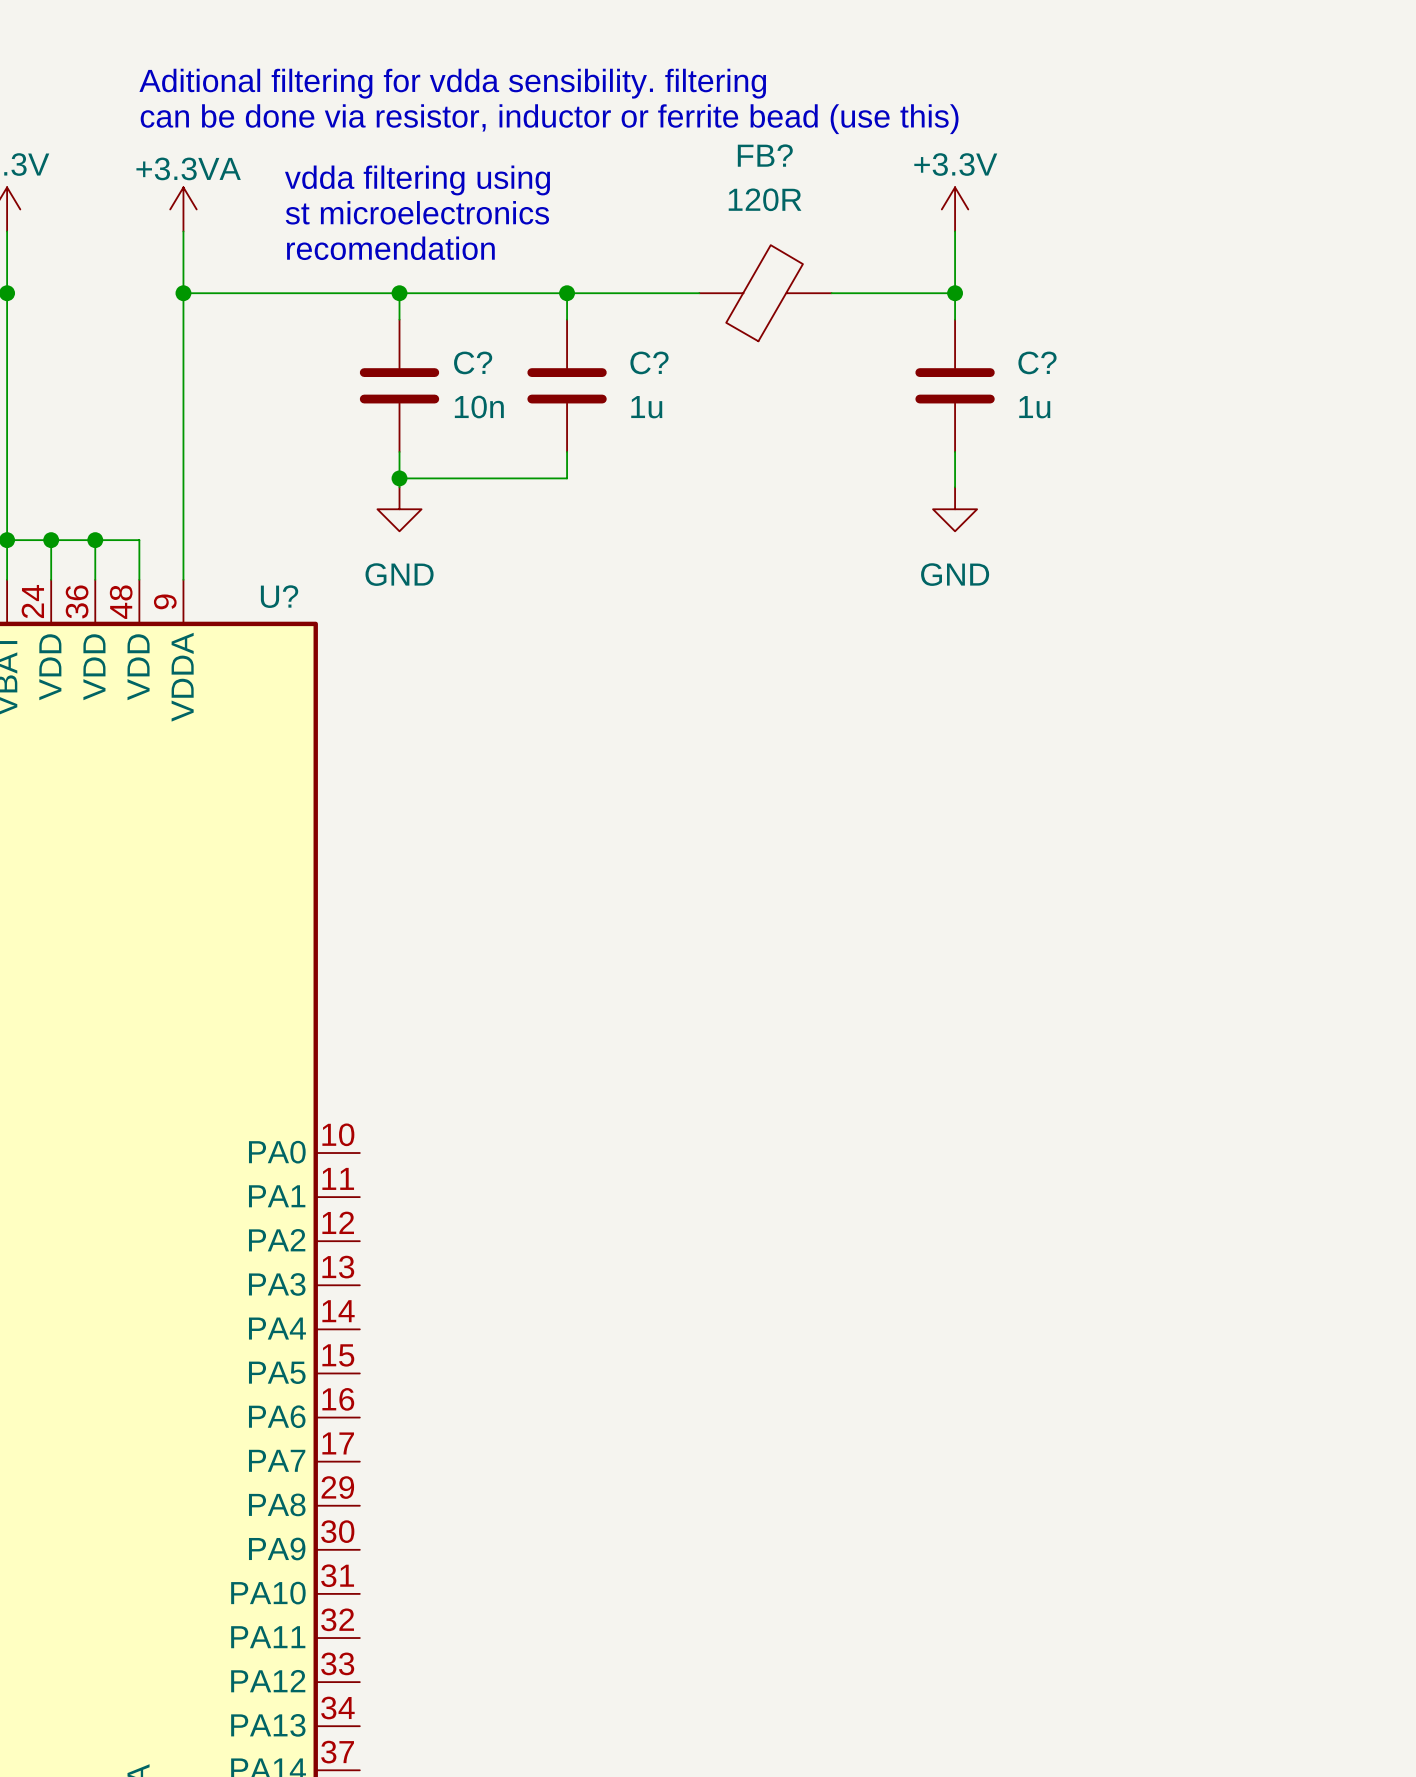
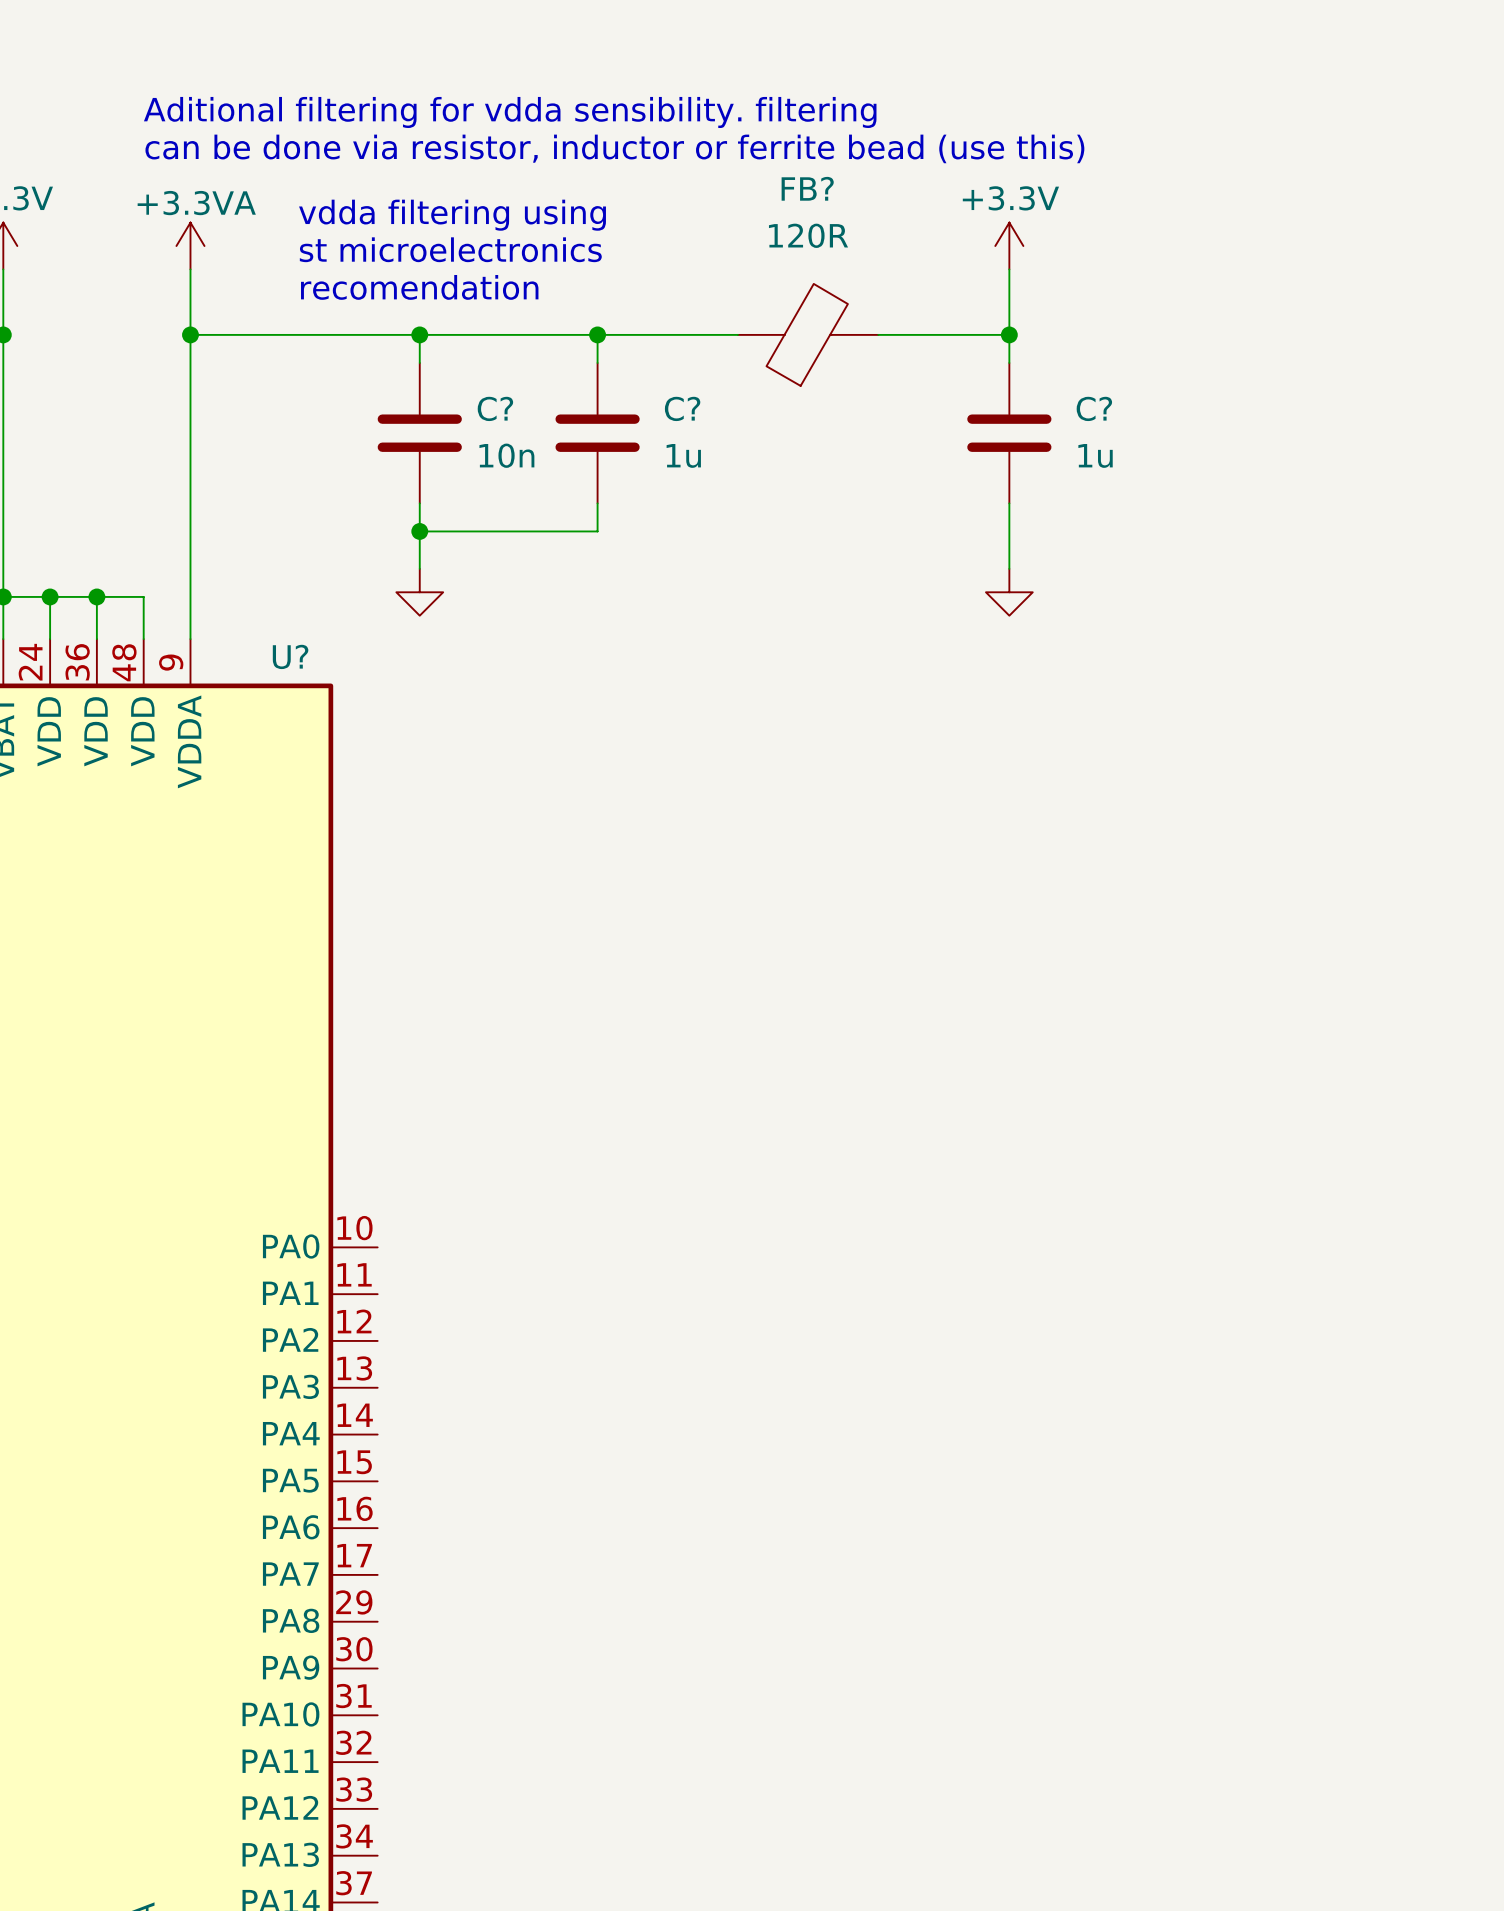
power symbol: GND (399, 509) -> none
power symbol: GND (955, 509) -> none
power symbol: none -> (419, 592)
power symbol: none -> (1009, 592)

